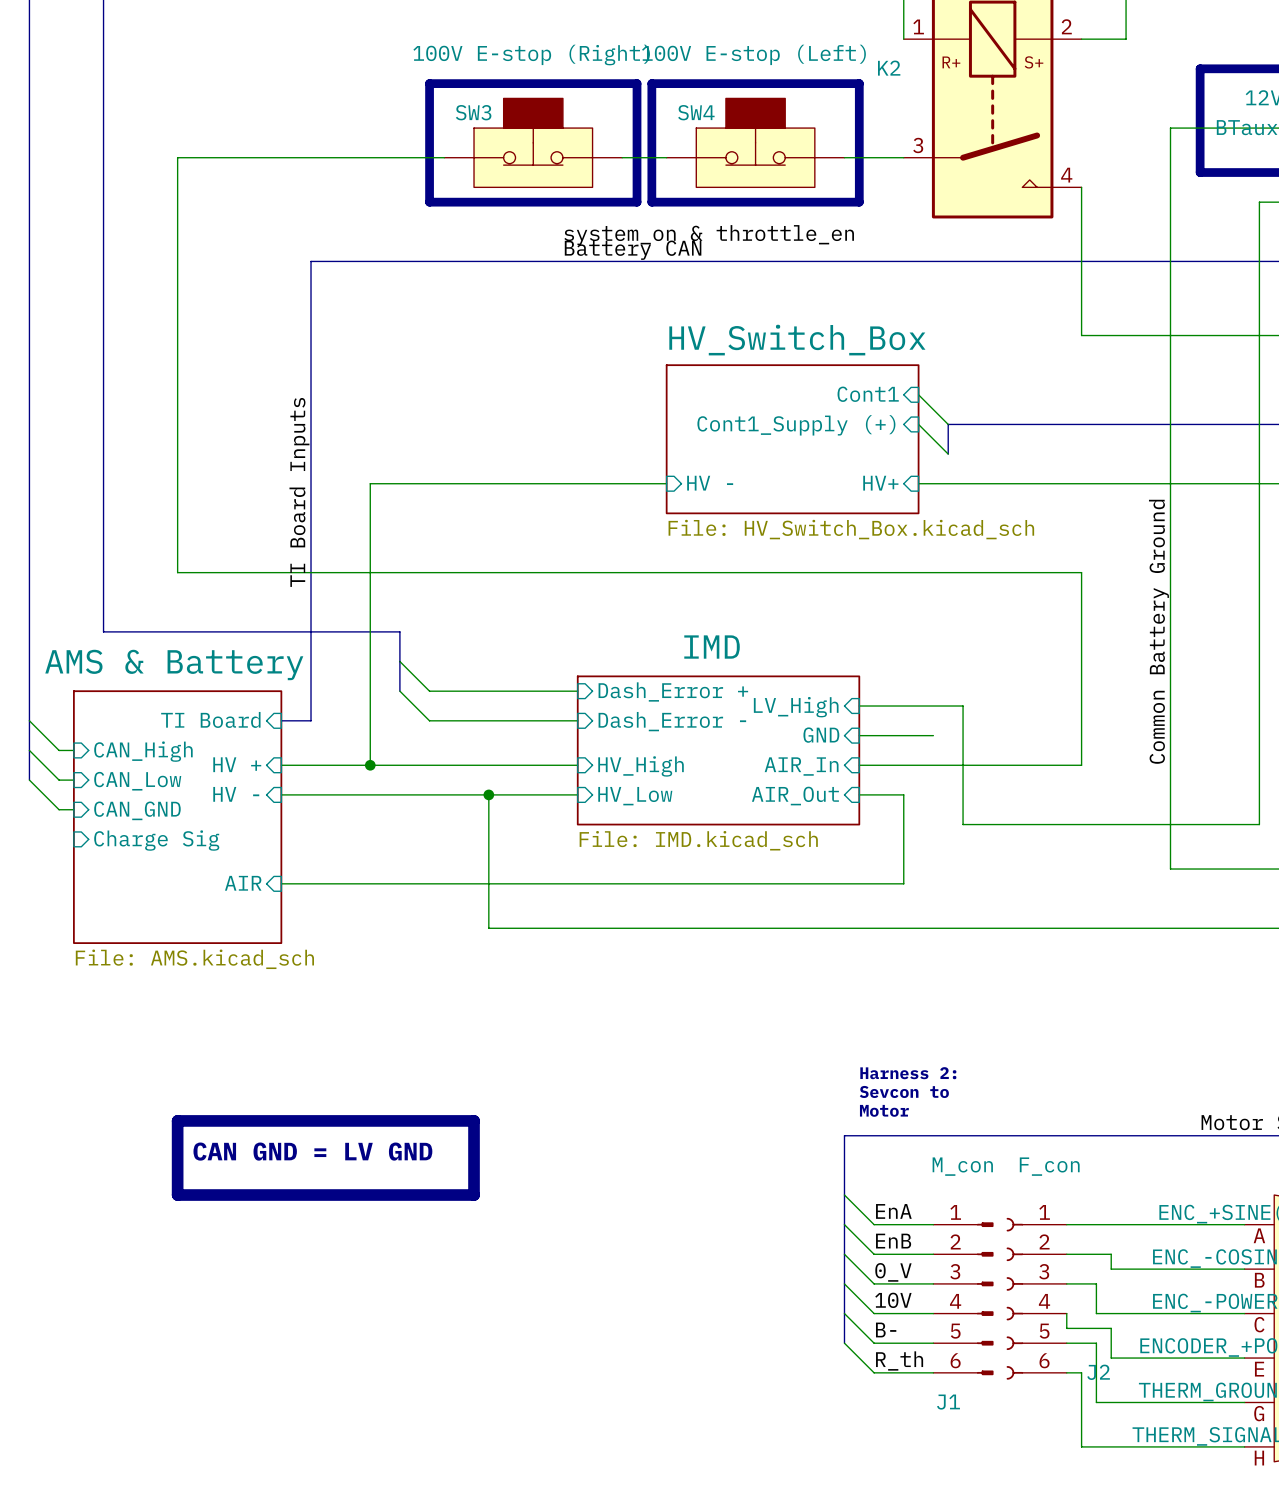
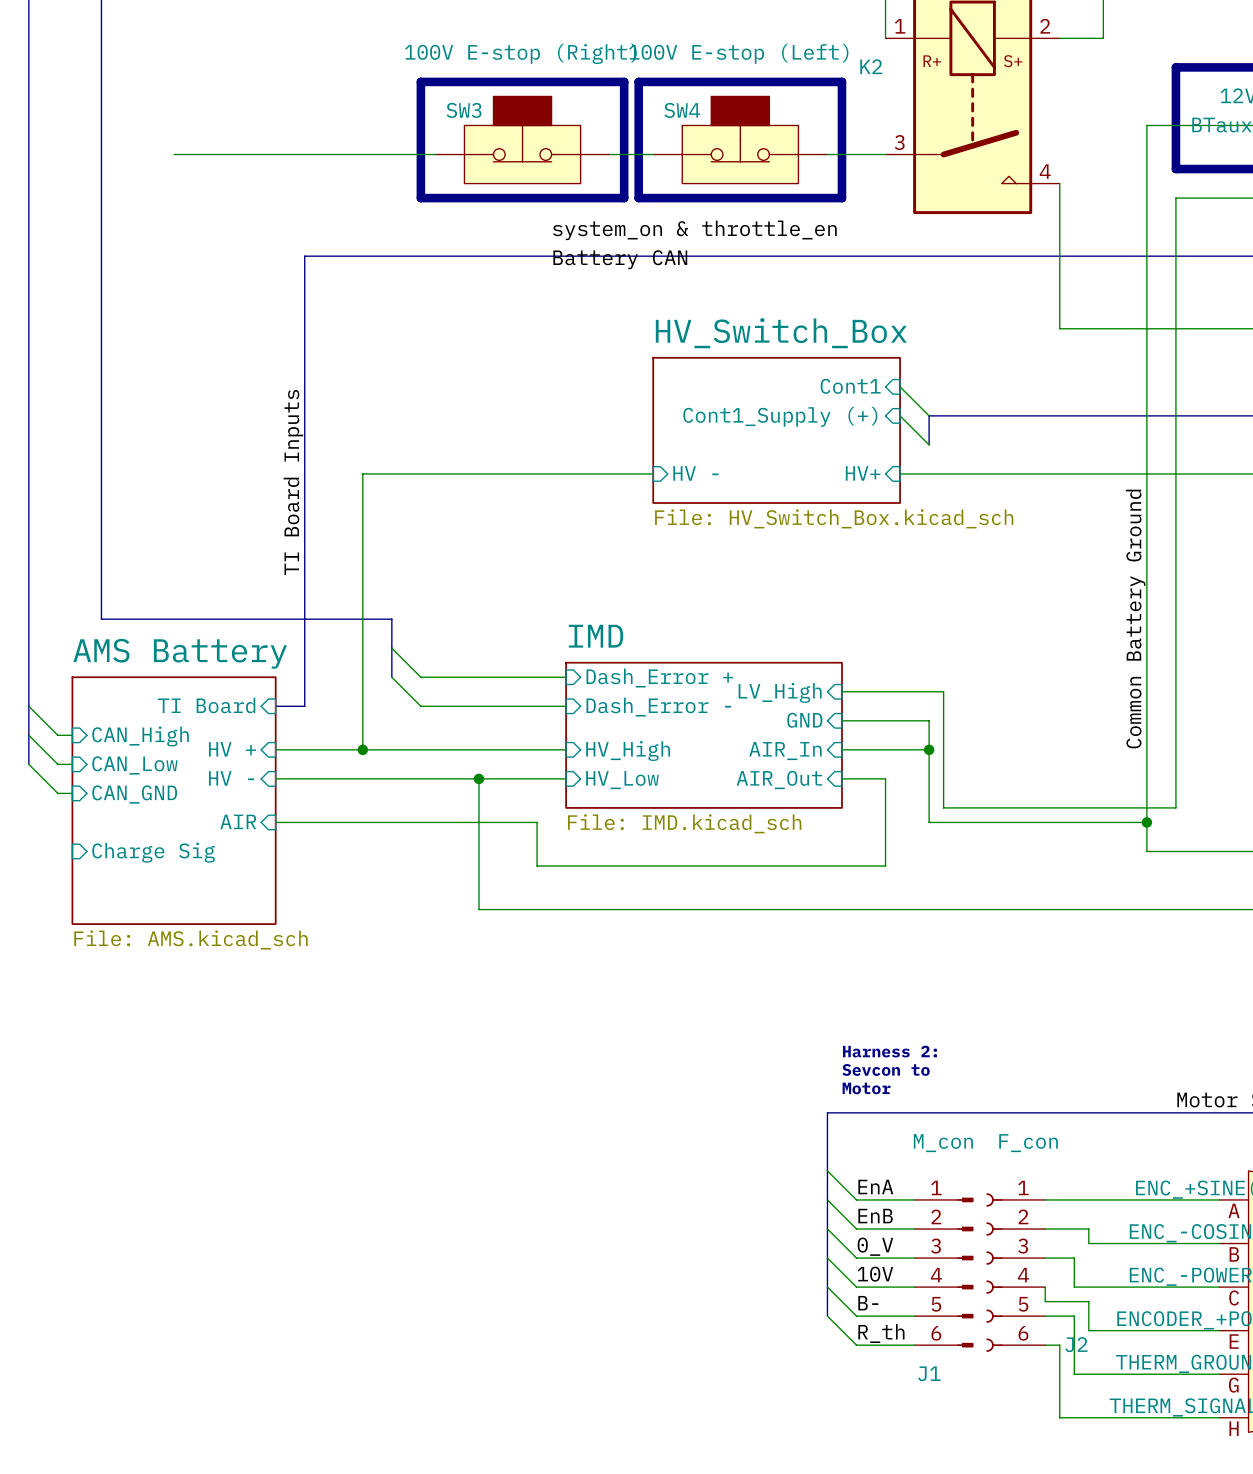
wire: (177, 157) (177, 572) (1081, 572) (1081, 765) (948, 765) -> none
wire: (1259, 202) (1259, 824) (1200, 824) -> (1234, 198) (1175, 198) (1175, 807)
label position: Battery CAN (633, 250) -> Battery CAN (620, 259)
sheet IMD name position: IMD (712, 647) -> IMD (596, 636)
sheet AMS & Battery name: AMS & Battery (174, 664) -> AMS Battery (180, 653)
wire: none -> (914, 720) (929, 720) (929, 822) (1146, 822)
junction: none -> (929, 749)
junction: none -> (1146, 822)
sheet pin position: Charge Sig (156, 840) -> Charge Sig (153, 852)
sheet pin position: AIR (243, 883) -> AIR (238, 821)
wire: (281, 883) (548, 883) -> (275, 822) (537, 822) (537, 866)
line: (177, 1120) (474, 1120) (474, 1195) (177, 1195) (177, 1120) -> none
text: CAN GND = LV GND (312, 1151) -> none

